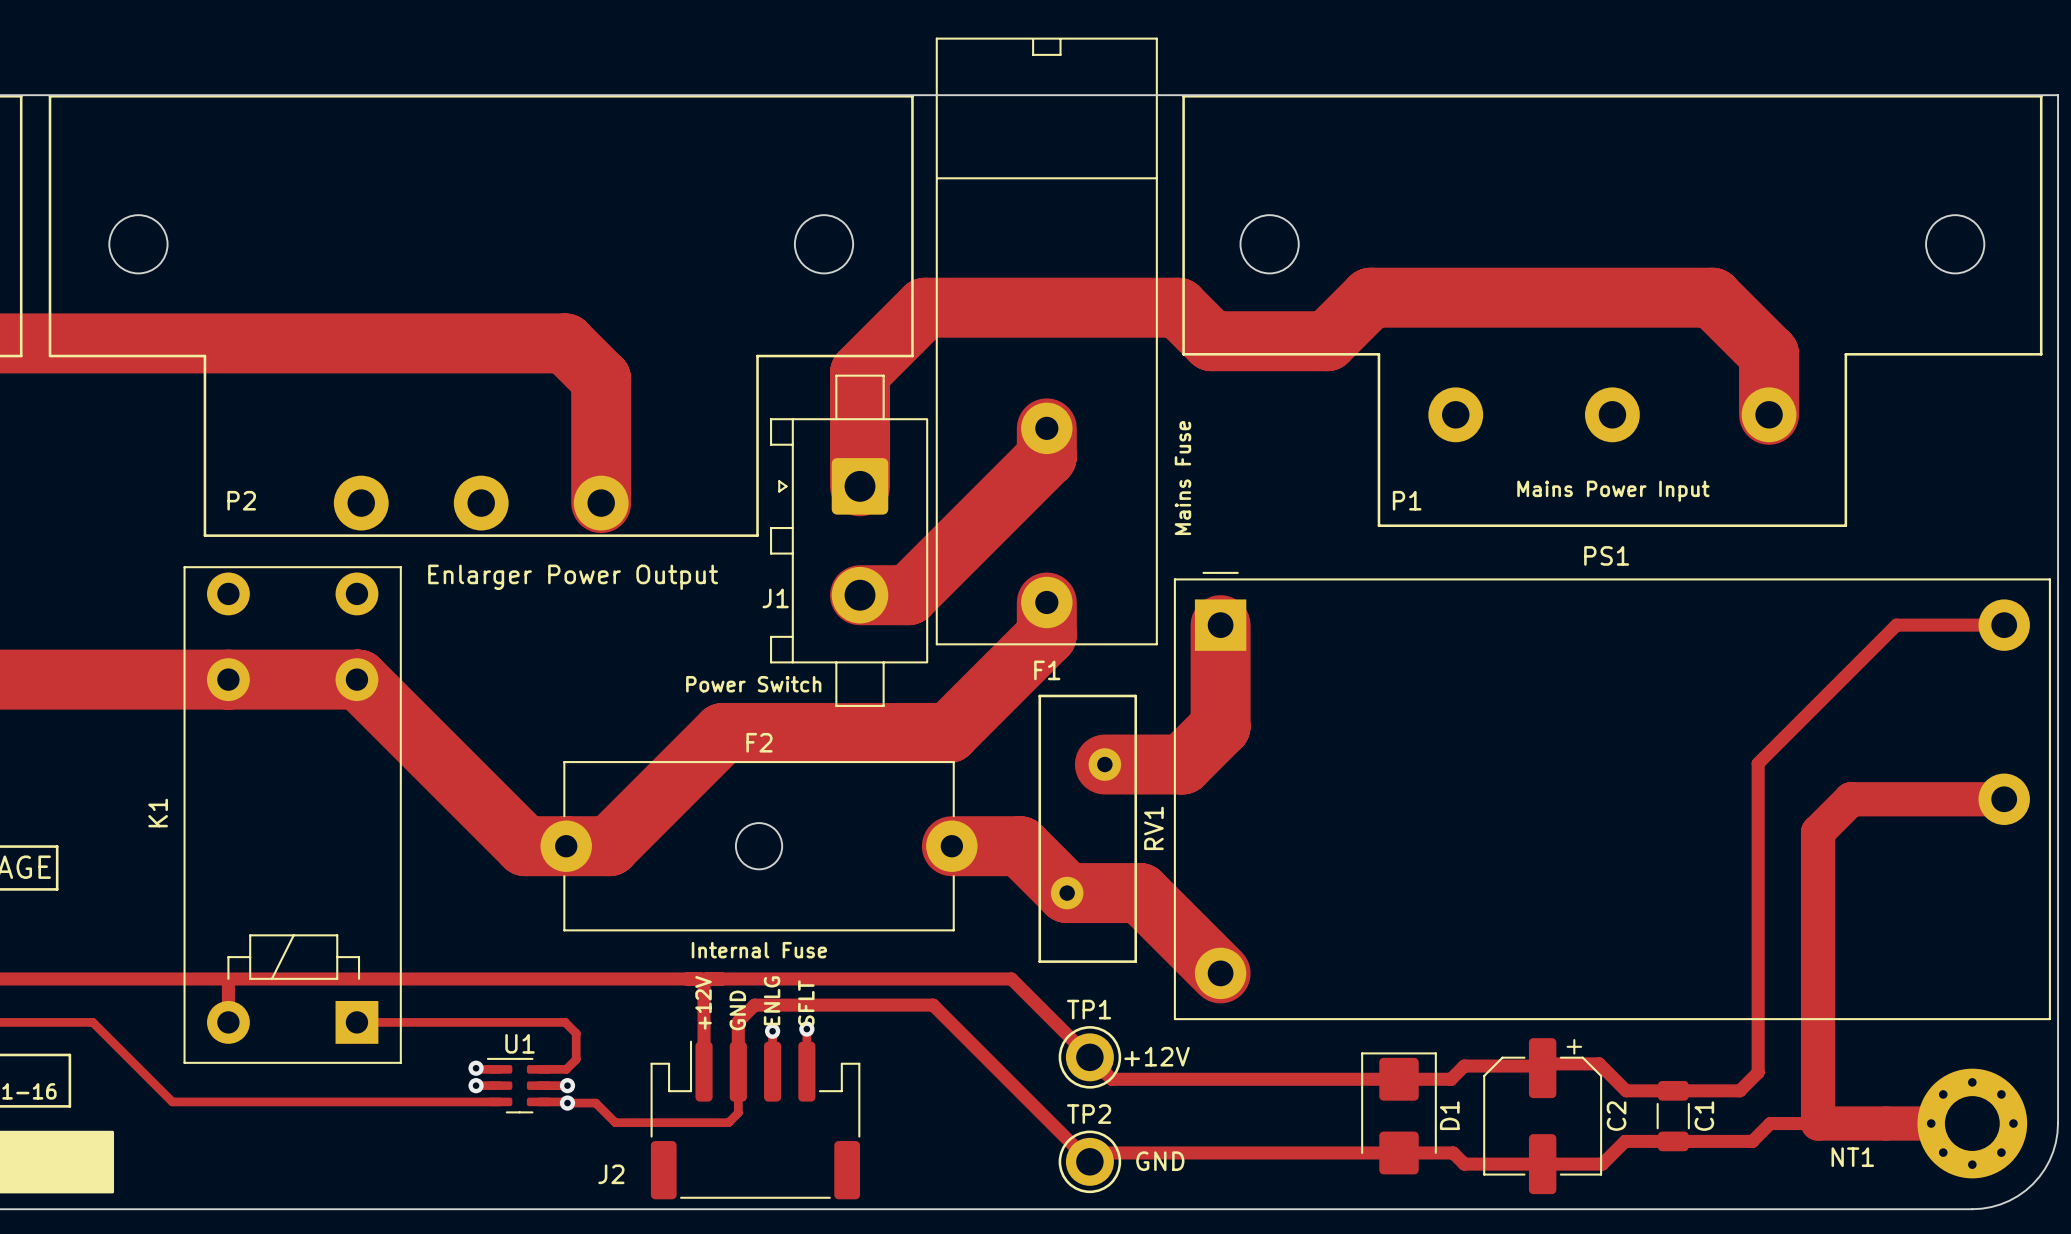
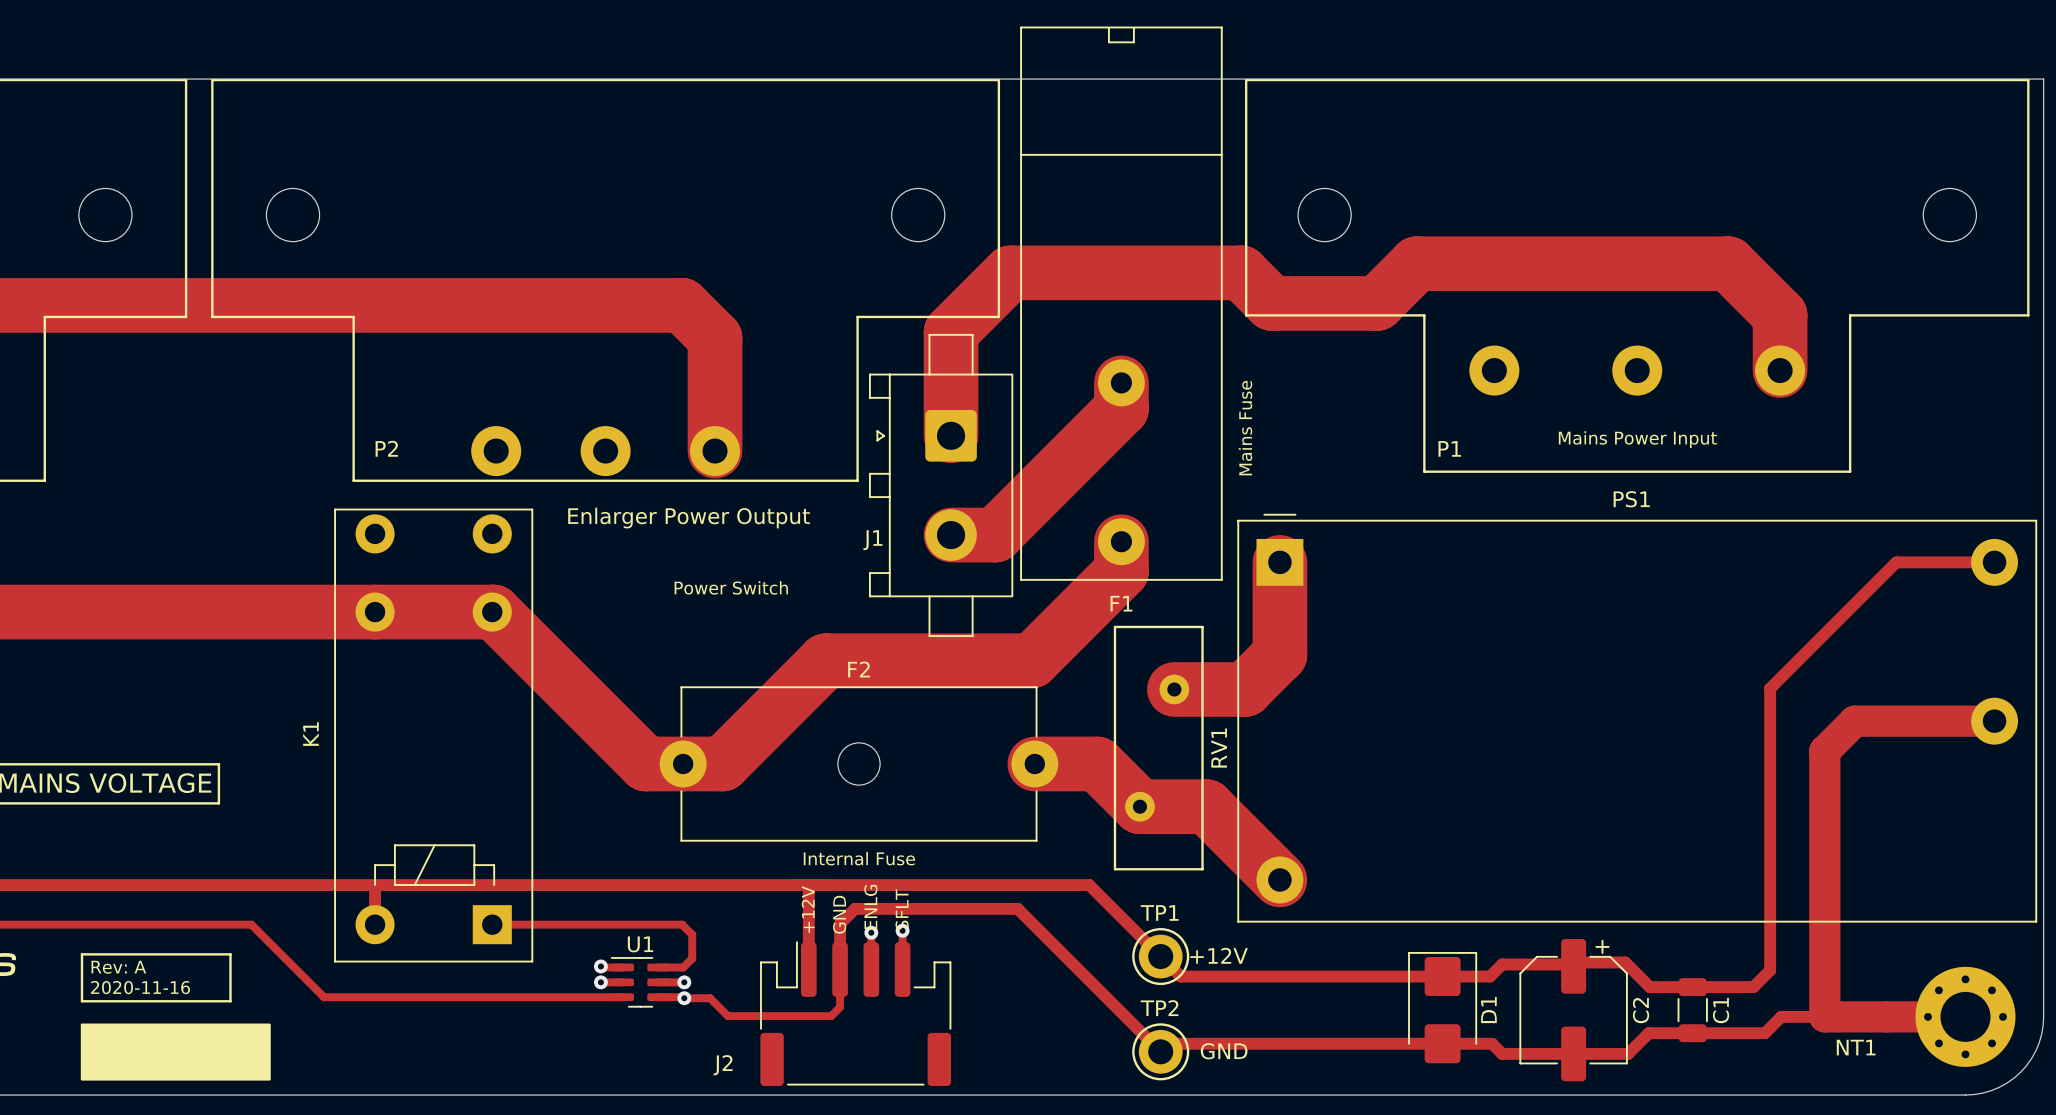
text position: Power Switch (753, 684) -> Power Switch (731, 587)

